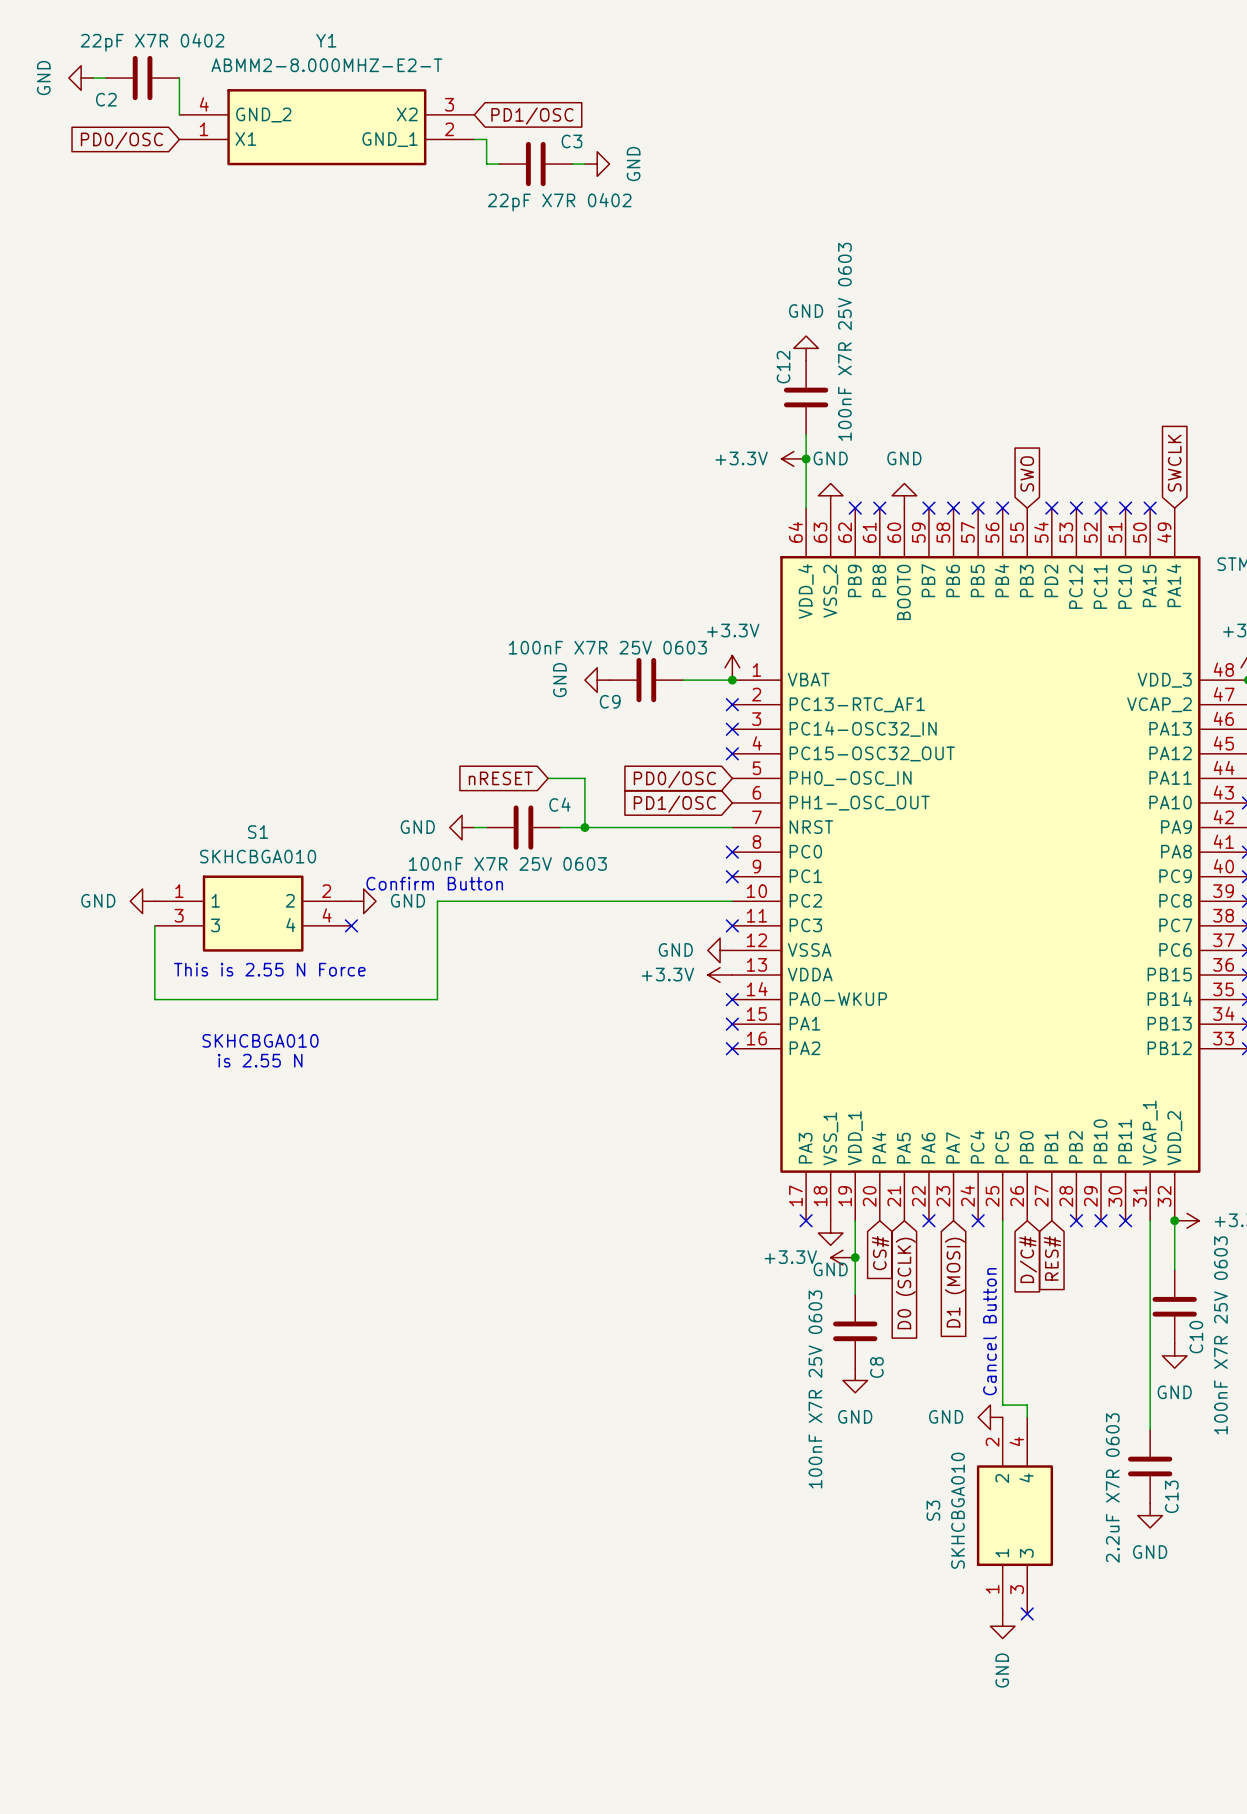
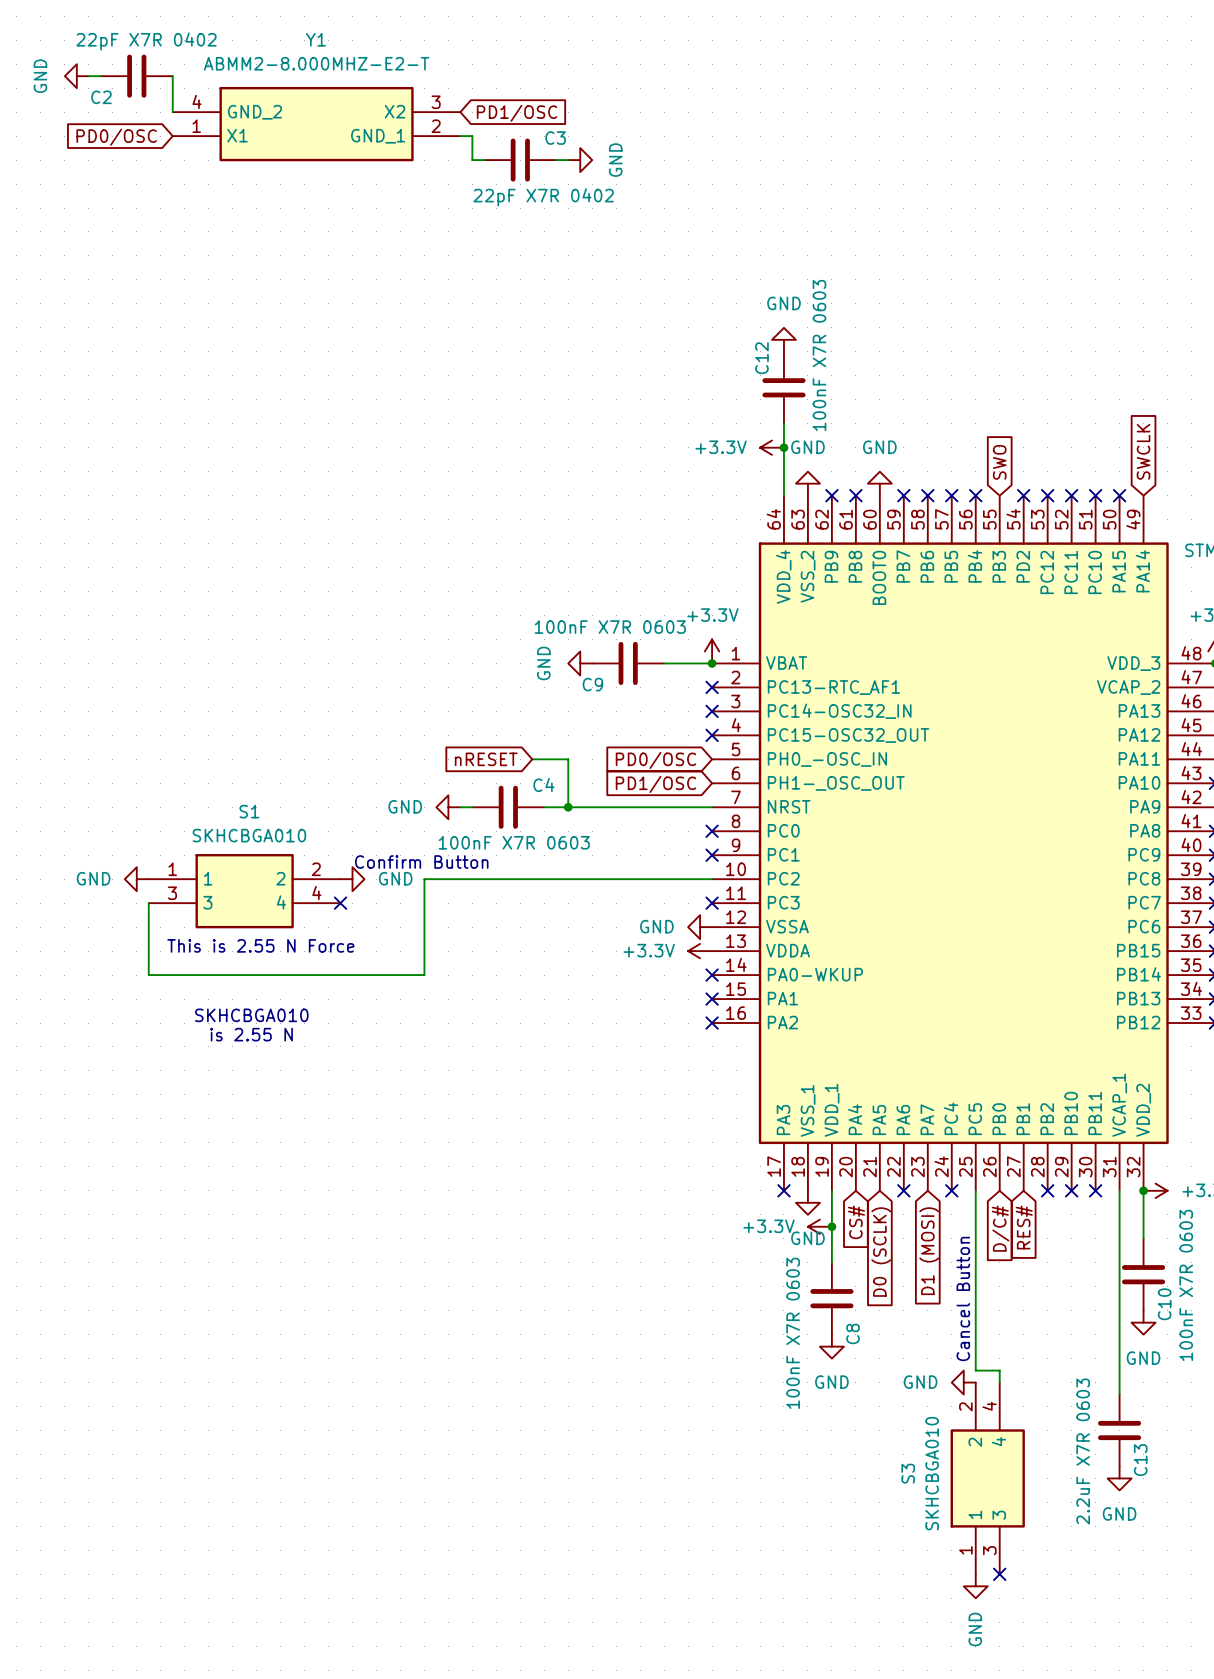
C12 value: 100nF X7R 25V 0603 (844, 341) -> 100nF X7R 0603 (819, 355)
C9 value: 100nF X7R 25V 0603 (607, 647) -> 100nF X7R 0603 (610, 627)
C4 value: 100nF X7R 25V 0603 (507, 863) -> 100nF X7R 0603 (514, 842)
C10 value: 100nF X7R 25V 0603 (1220, 1335) -> 100nF X7R 0603 (1186, 1285)
C8 value: 100nF X7R 25V 0603 (815, 1389) -> 100nF X7R 0603 (793, 1333)

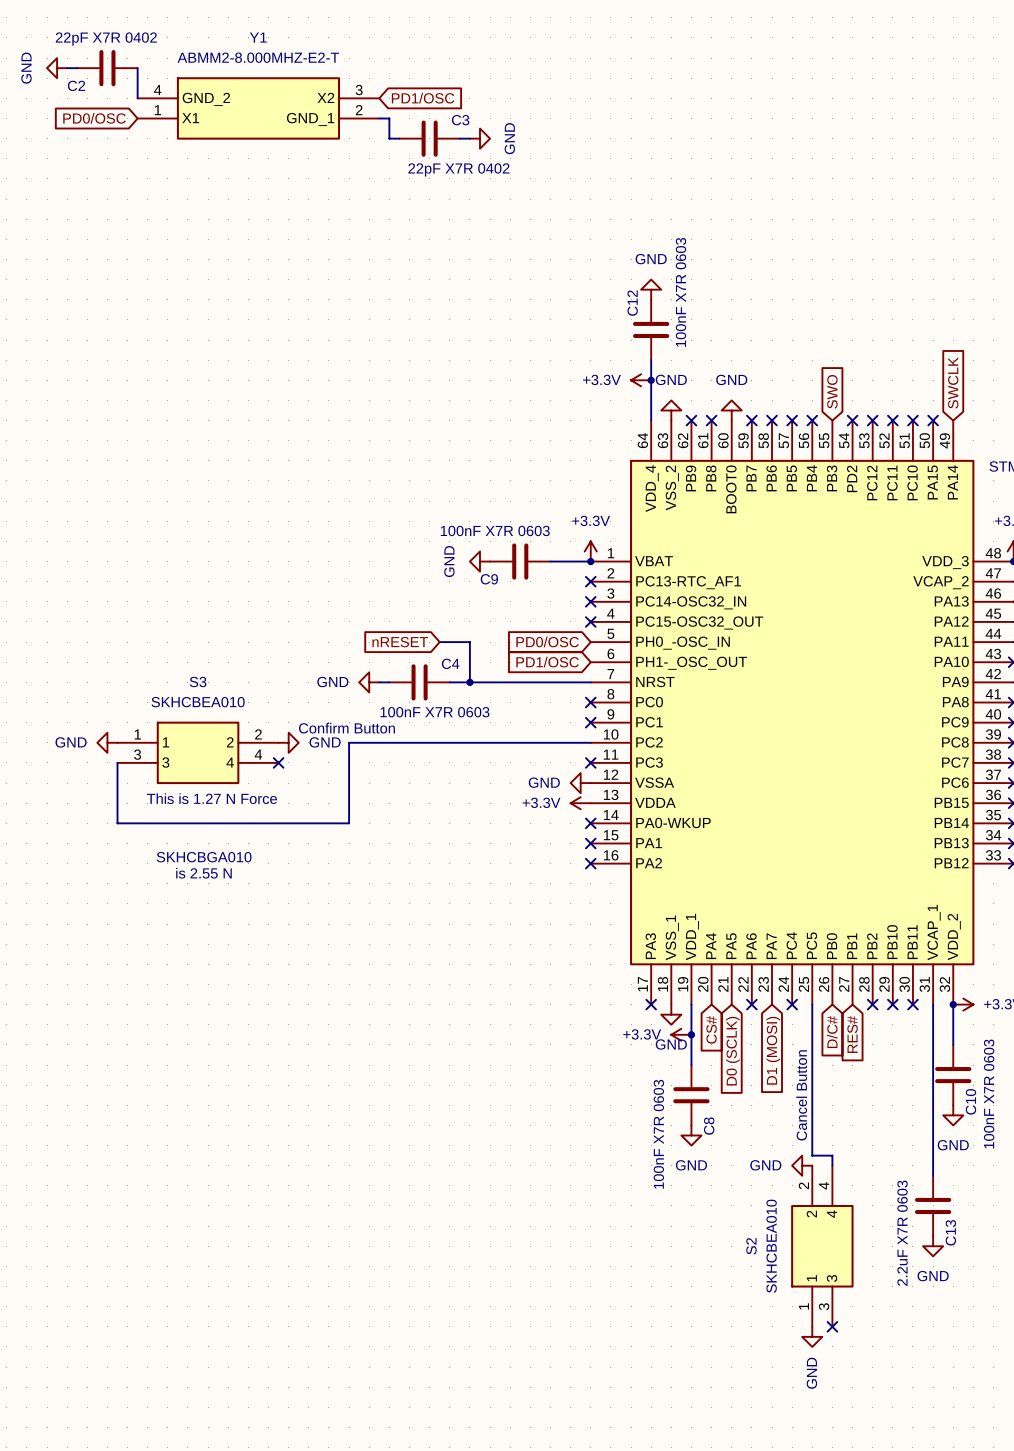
S1 name: S1 (249, 811) -> S3 (198, 682)
S1 value: SKHCBGA010 (249, 835) -> SKHCBEA010 (198, 702)
text: This is 2.55 N Force (260, 945) -> This is 1.27 N Force (211, 798)
S3 name: S3 (908, 1473) -> S2 (751, 1246)
S3 value: SKHCBGA010 (932, 1473) -> SKHCBEA010 (771, 1246)

